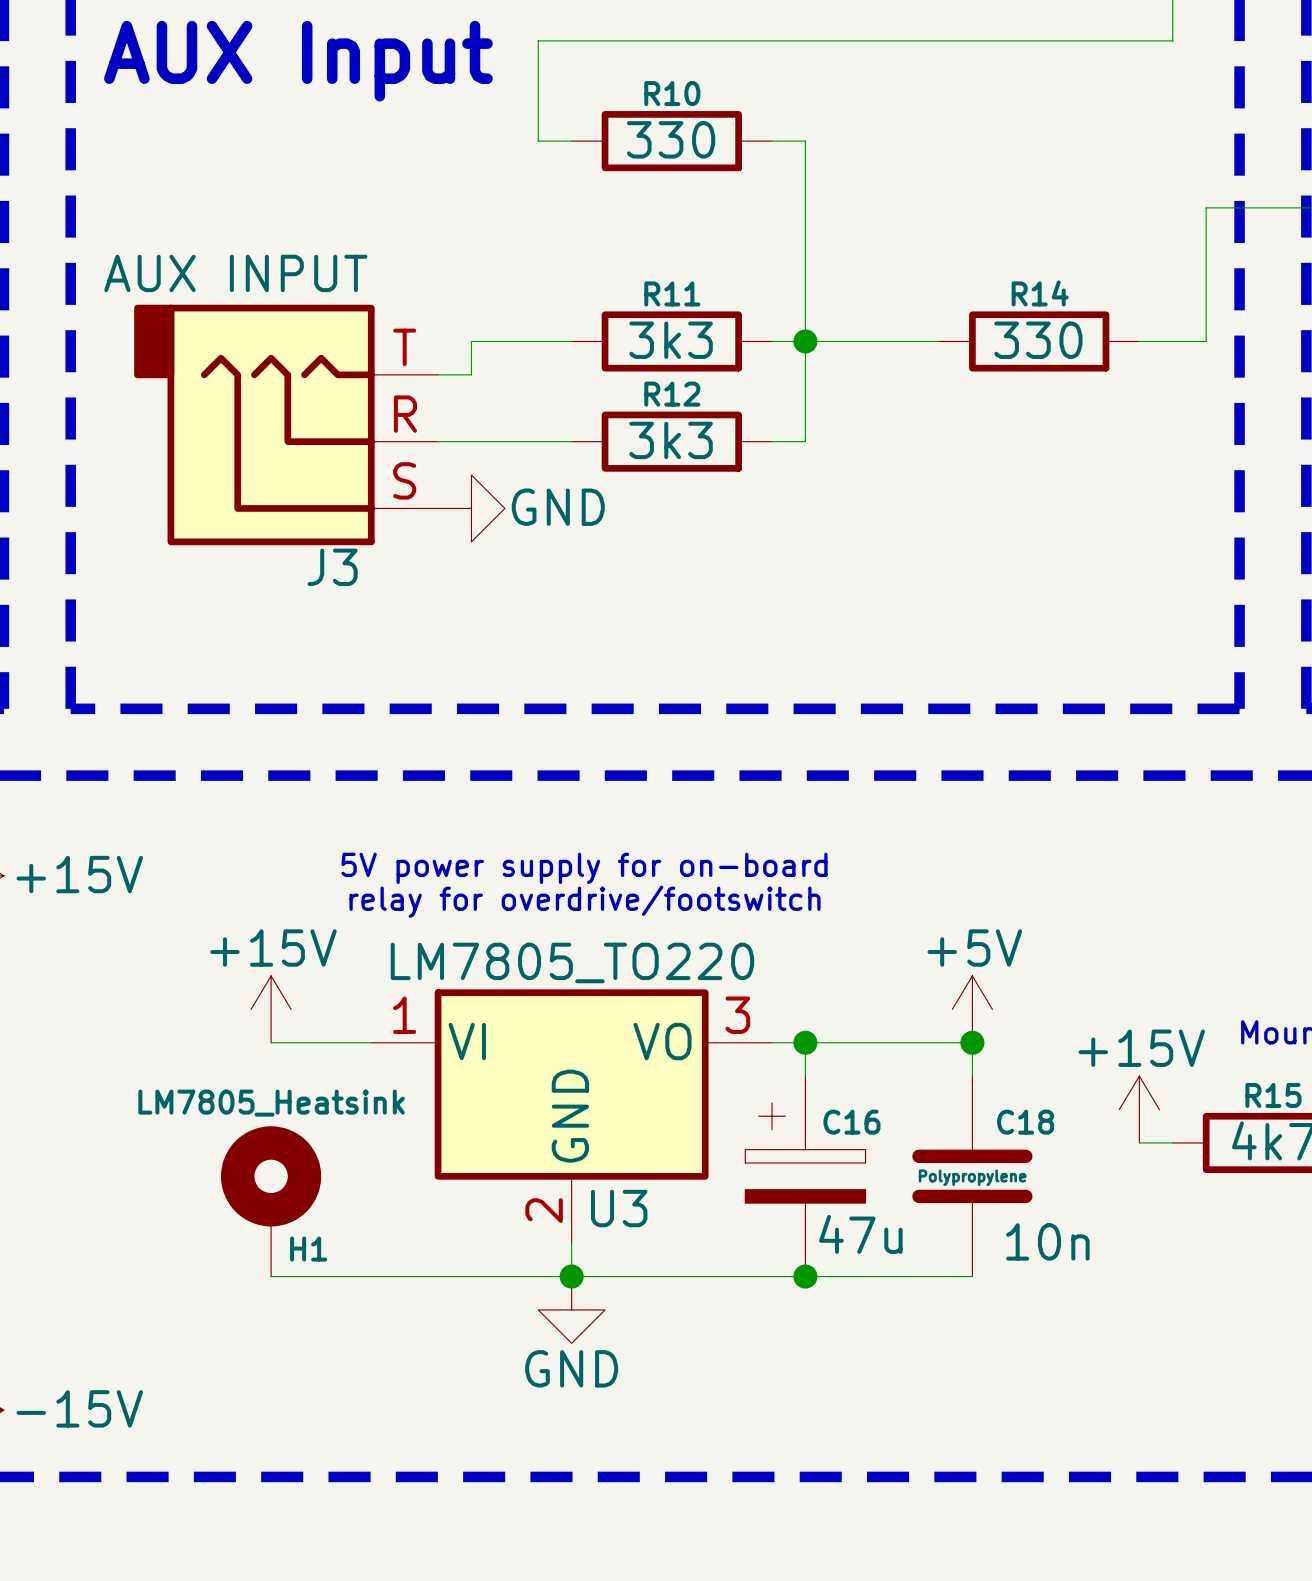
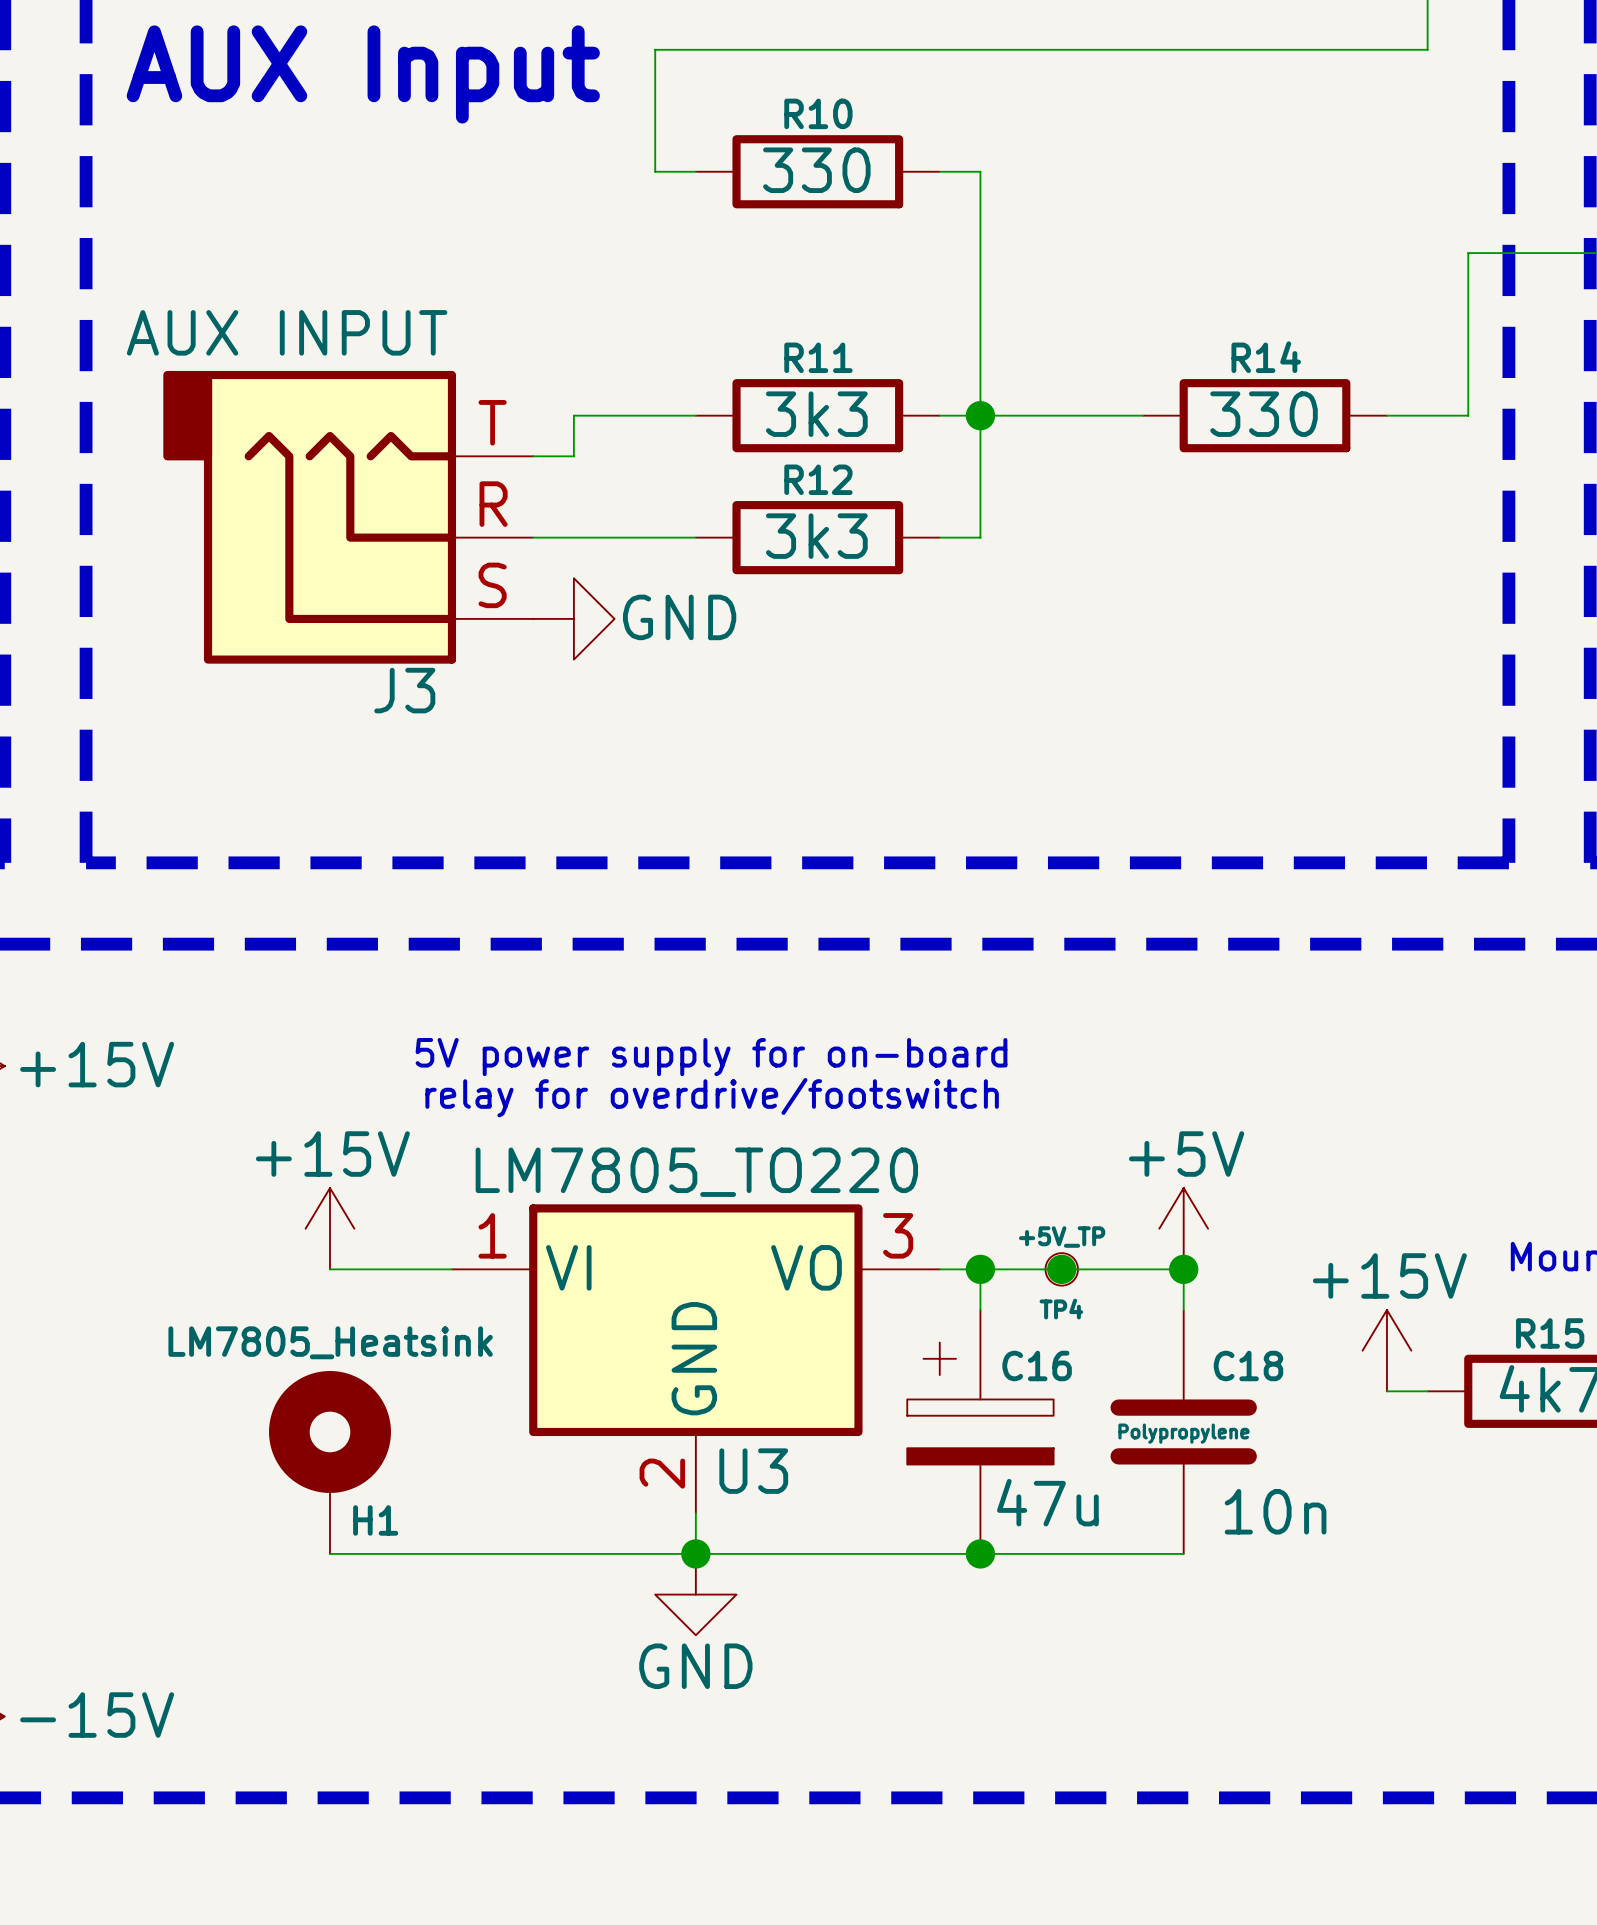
junction: none -> (1061, 1269)
TP4: none -> +5V_TP (1061, 1269)

